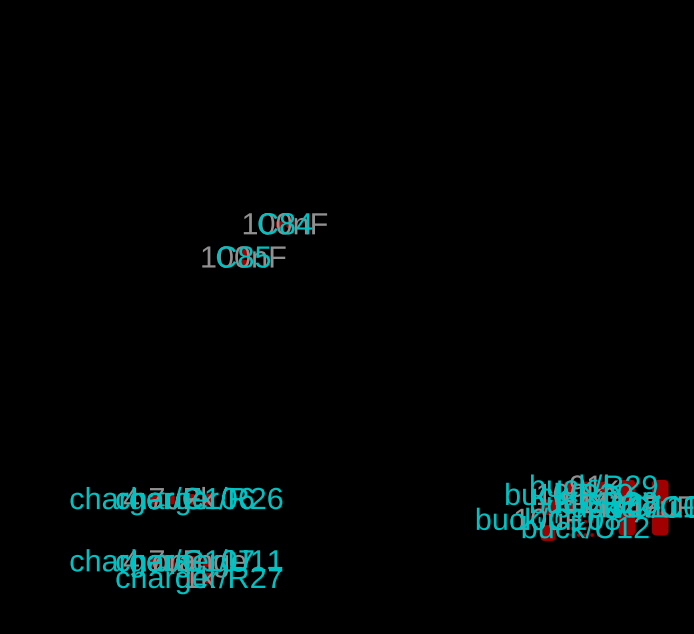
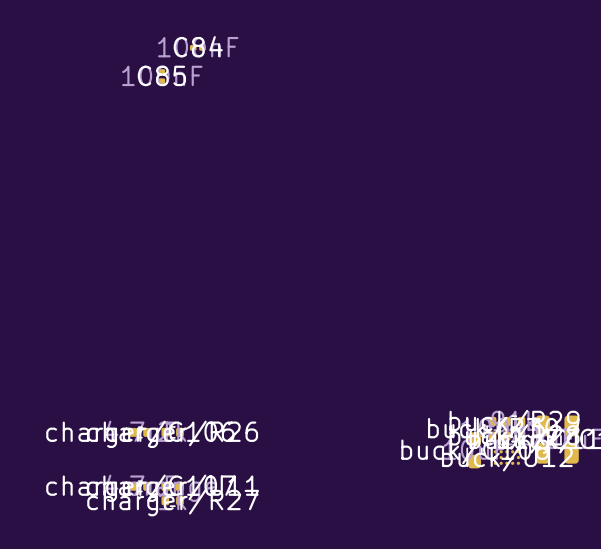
C84 position: (284, 224) -> (197, 47)
C85 position: (243, 257) -> (161, 76)

